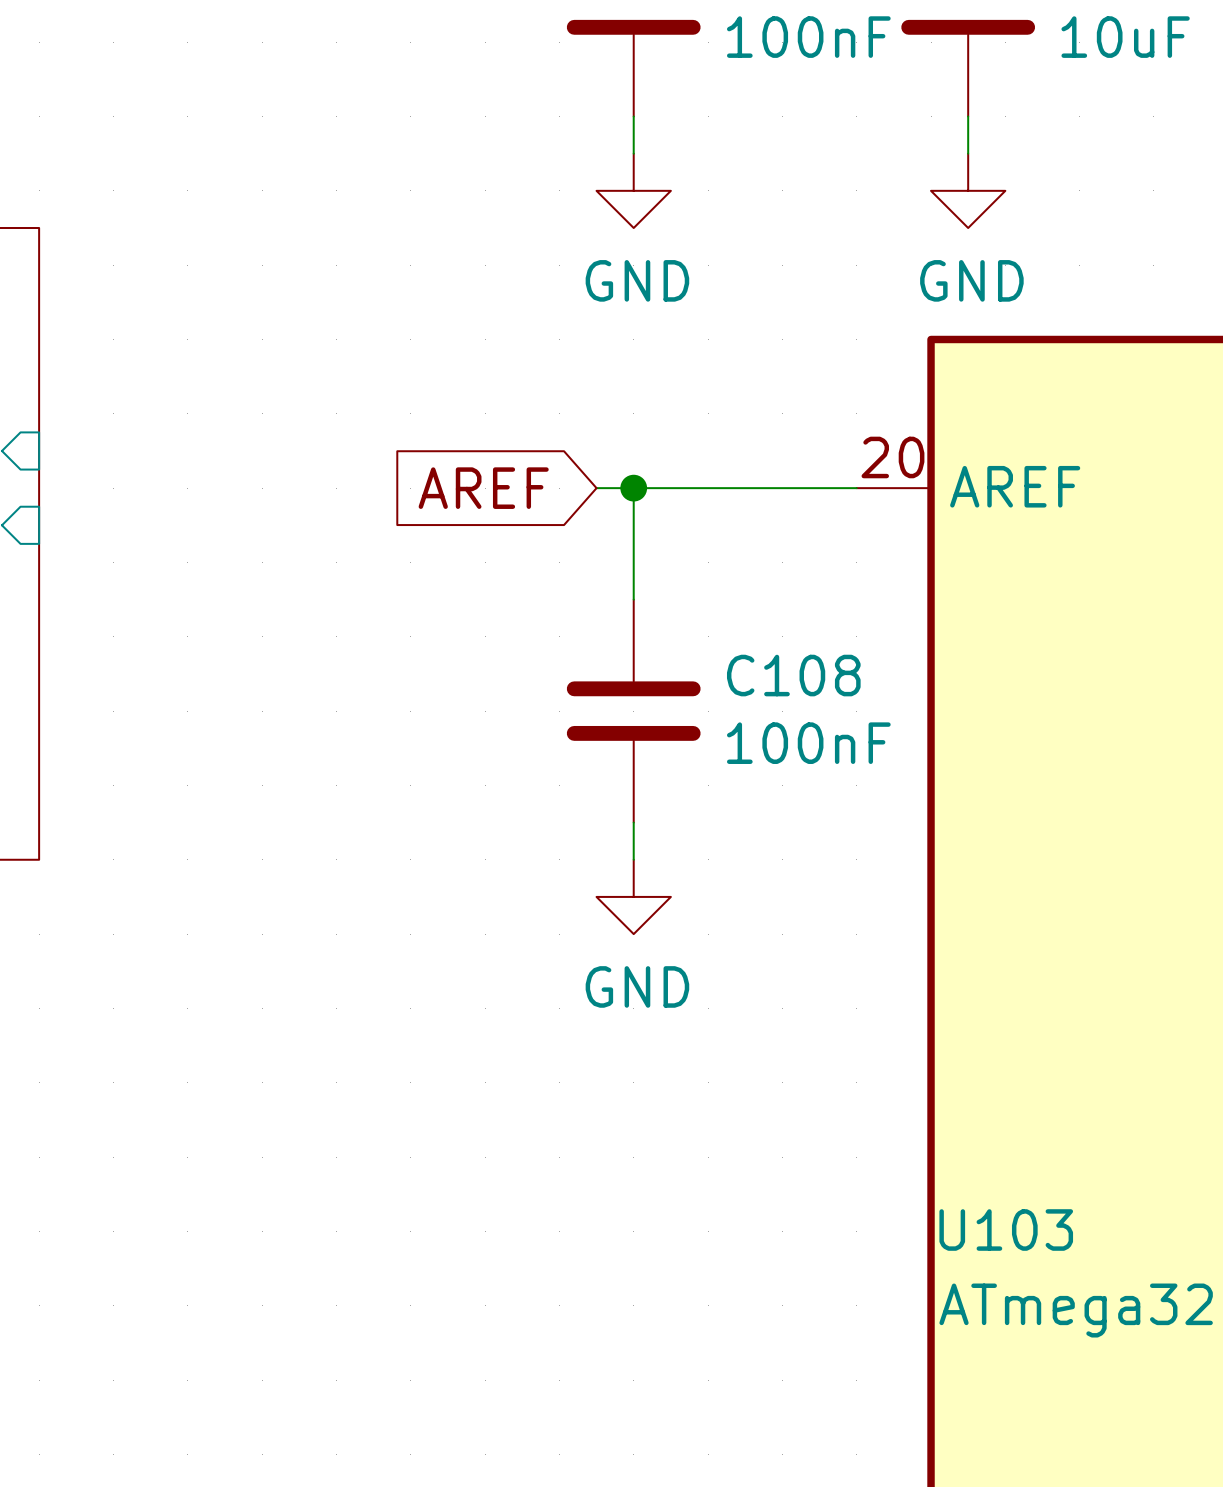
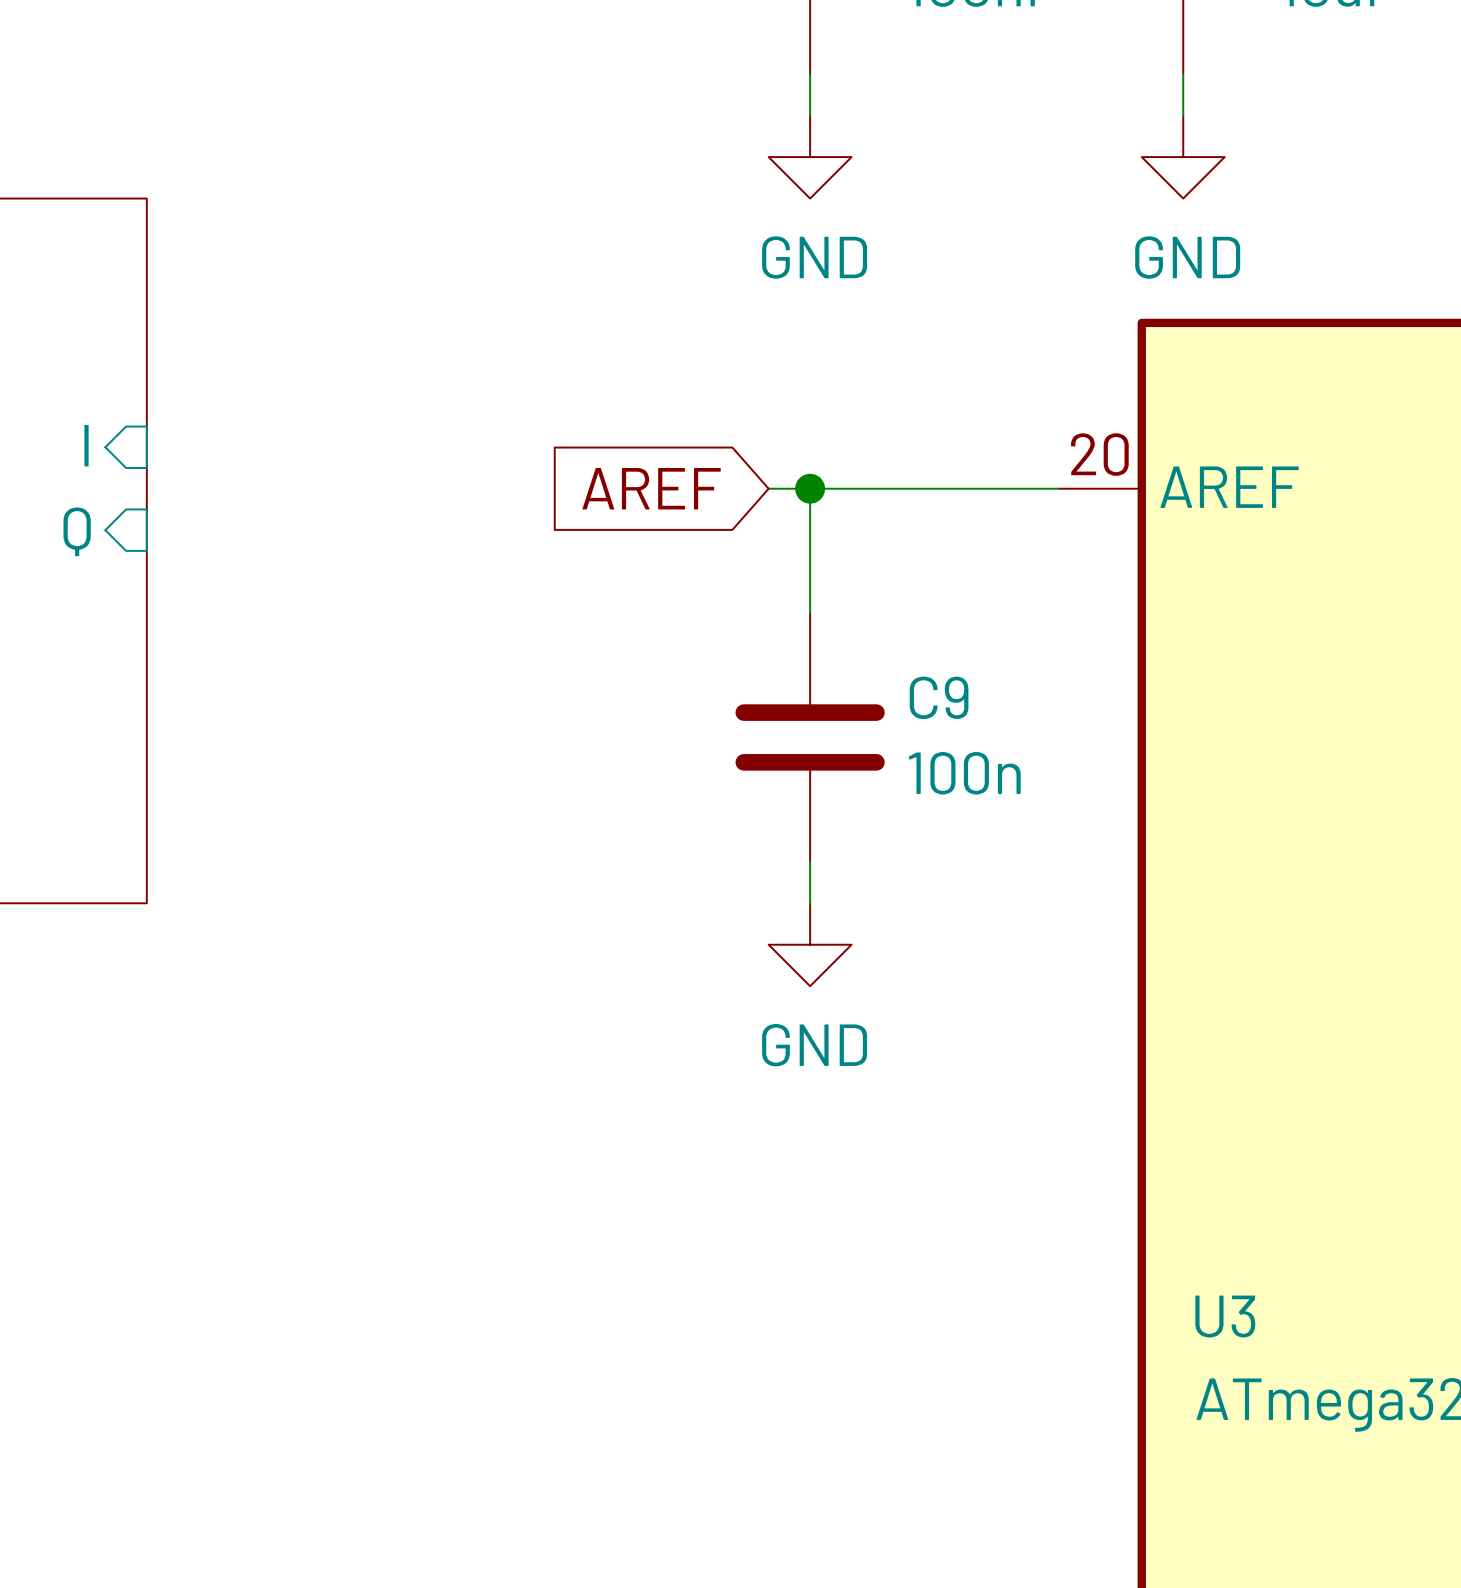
C108 name: C108 (793, 675) -> C9 (939, 697)
C108 value: 100nF (808, 743) -> 100n (964, 773)
U103 name: U103 (1006, 1230) -> U3 (1225, 1316)

